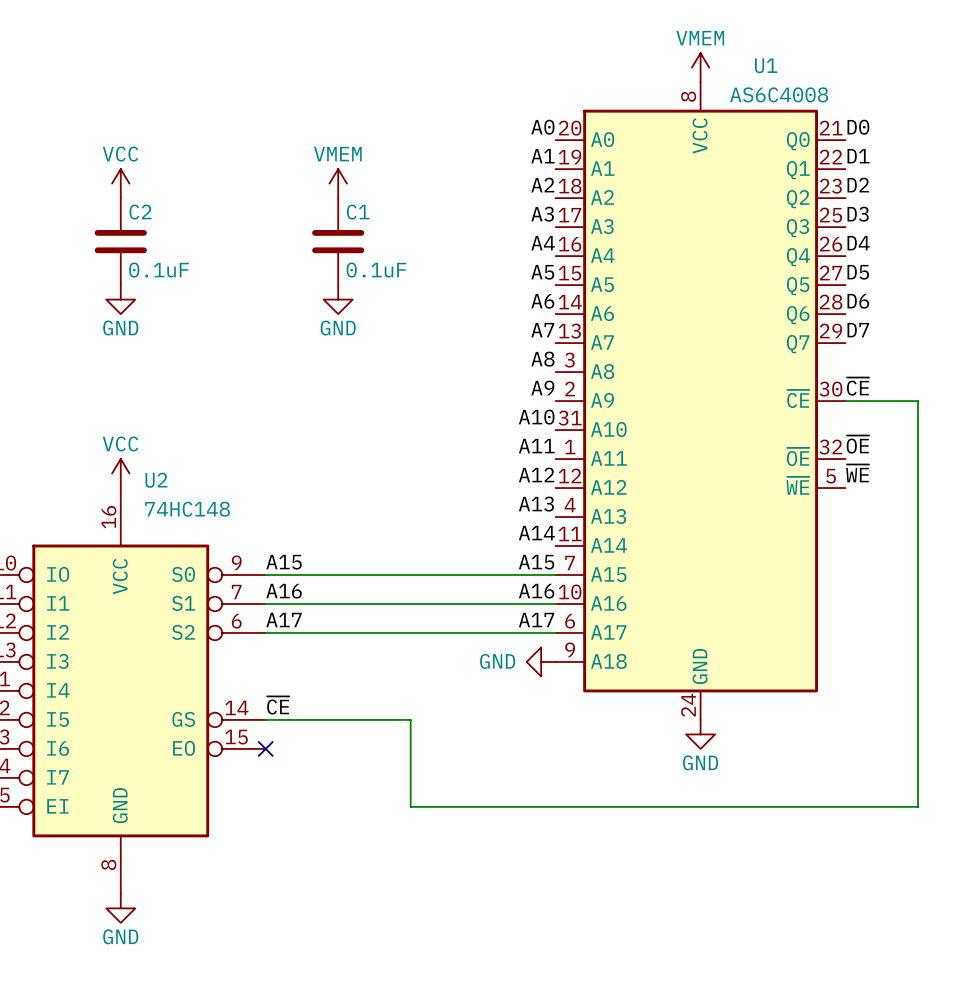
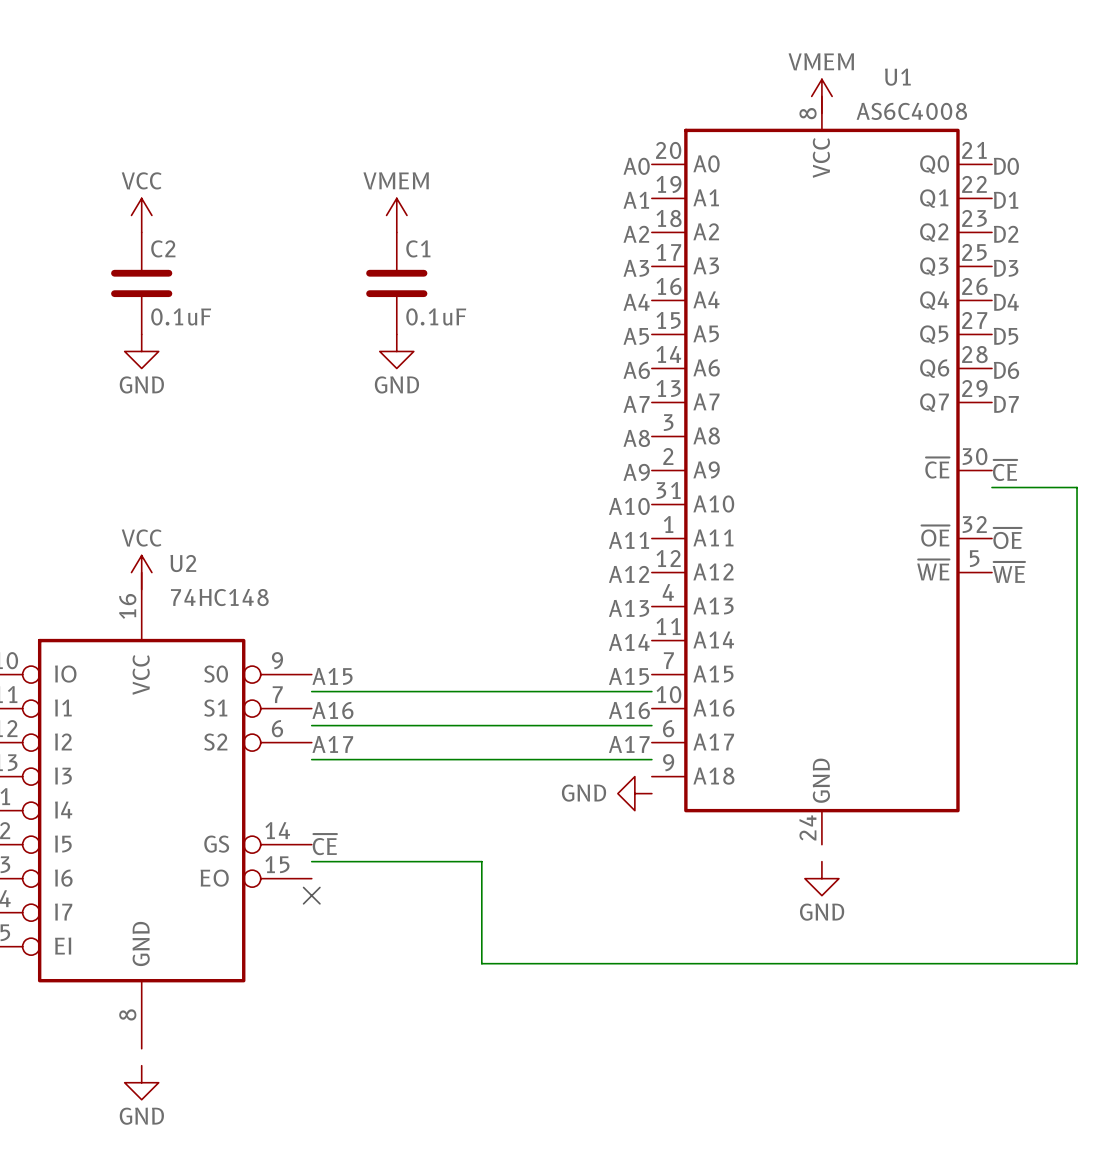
power symbol position: VMEM (700, 67) -> VMEM (821, 96)
label position: A0 (542, 127) -> A0 (636, 166)
label position: D0 (858, 127) -> D0 (1006, 166)
label position: A1 (543, 156) -> A1 (636, 200)
label position: D1 (858, 156) -> D1 (1006, 200)
label position: A2 (542, 185) -> A2 (636, 234)
label position: D2 (858, 185) -> D2 (1006, 234)
label position: A3 (542, 214) -> A3 (636, 268)
label position: D3 (858, 214) -> D3 (1006, 268)
label position: A4 (543, 243) -> A4 (636, 302)
label position: D4 (858, 243) -> D4 (1006, 302)
label position: A5 (542, 272) -> A5 (636, 336)
label position: D5 (858, 272) -> D5 (1006, 336)
label position: A6 (542, 301) -> A6 (636, 370)
label position: D6 (858, 301) -> D6 (1006, 370)
label position: A7 (542, 330) -> A7 (636, 404)
label position: D7 (858, 330) -> D7 (1006, 404)
label position: A8 (542, 359) -> A8 (636, 438)
label position: ~{CE} (857, 386) -> ~{CE} (1005, 470)
label position: A9 (542, 387) -> A9 (636, 472)
wire: (845, 401) (918, 401) (918, 415) -> (991, 487) (1077, 487)
label position: A10 (536, 417) -> A10 (629, 506)
label position: ~{OE} (857, 444) -> ~{OE} (1007, 538)
label position: A11 (536, 446) -> A11 (629, 540)
power symbol position: VCC (120, 473) -> VCC (141, 572)
label position: ~{WE} (857, 473) -> ~{WE} (1008, 572)
label position: A12 (536, 474) -> A12 (629, 574)
label position: A13 (536, 504) -> A13 (629, 608)
label position: A14 (536, 533) -> A14 (629, 642)
label position: A15 (284, 562) -> A15 (332, 676)
label position: A15 (536, 562) -> A15 (628, 676)
wire: (265, 574) (555, 574) -> (311, 691) (651, 691)
label position: A16 (284, 591) -> A16 (332, 710)
label position: A16 (536, 591) -> A16 (629, 710)
wire: (265, 603) (555, 603) -> (311, 725) (651, 725)
label position: A17 (284, 620) -> A17 (332, 744)
label position: A17 (536, 620) -> A17 (629, 744)
wire: (265, 632) (555, 632) -> (311, 759) (651, 759)
power symbol position: GND (541, 661) -> GND (634, 793)
label position: ~{CE} (278, 705) -> ~{CE} (324, 844)
wire: (265, 719) (410, 719) (410, 734) -> (311, 861) (481, 861)
power symbol position: GND (700, 734) -> GND (821, 878)
no-connect mark position: (265, 748) -> (311, 895)
wire: (410, 806) (918, 806) -> (481, 946) (481, 963) (1077, 963) (1077, 946)
power symbol position: GND (120, 908) -> GND (141, 1082)

